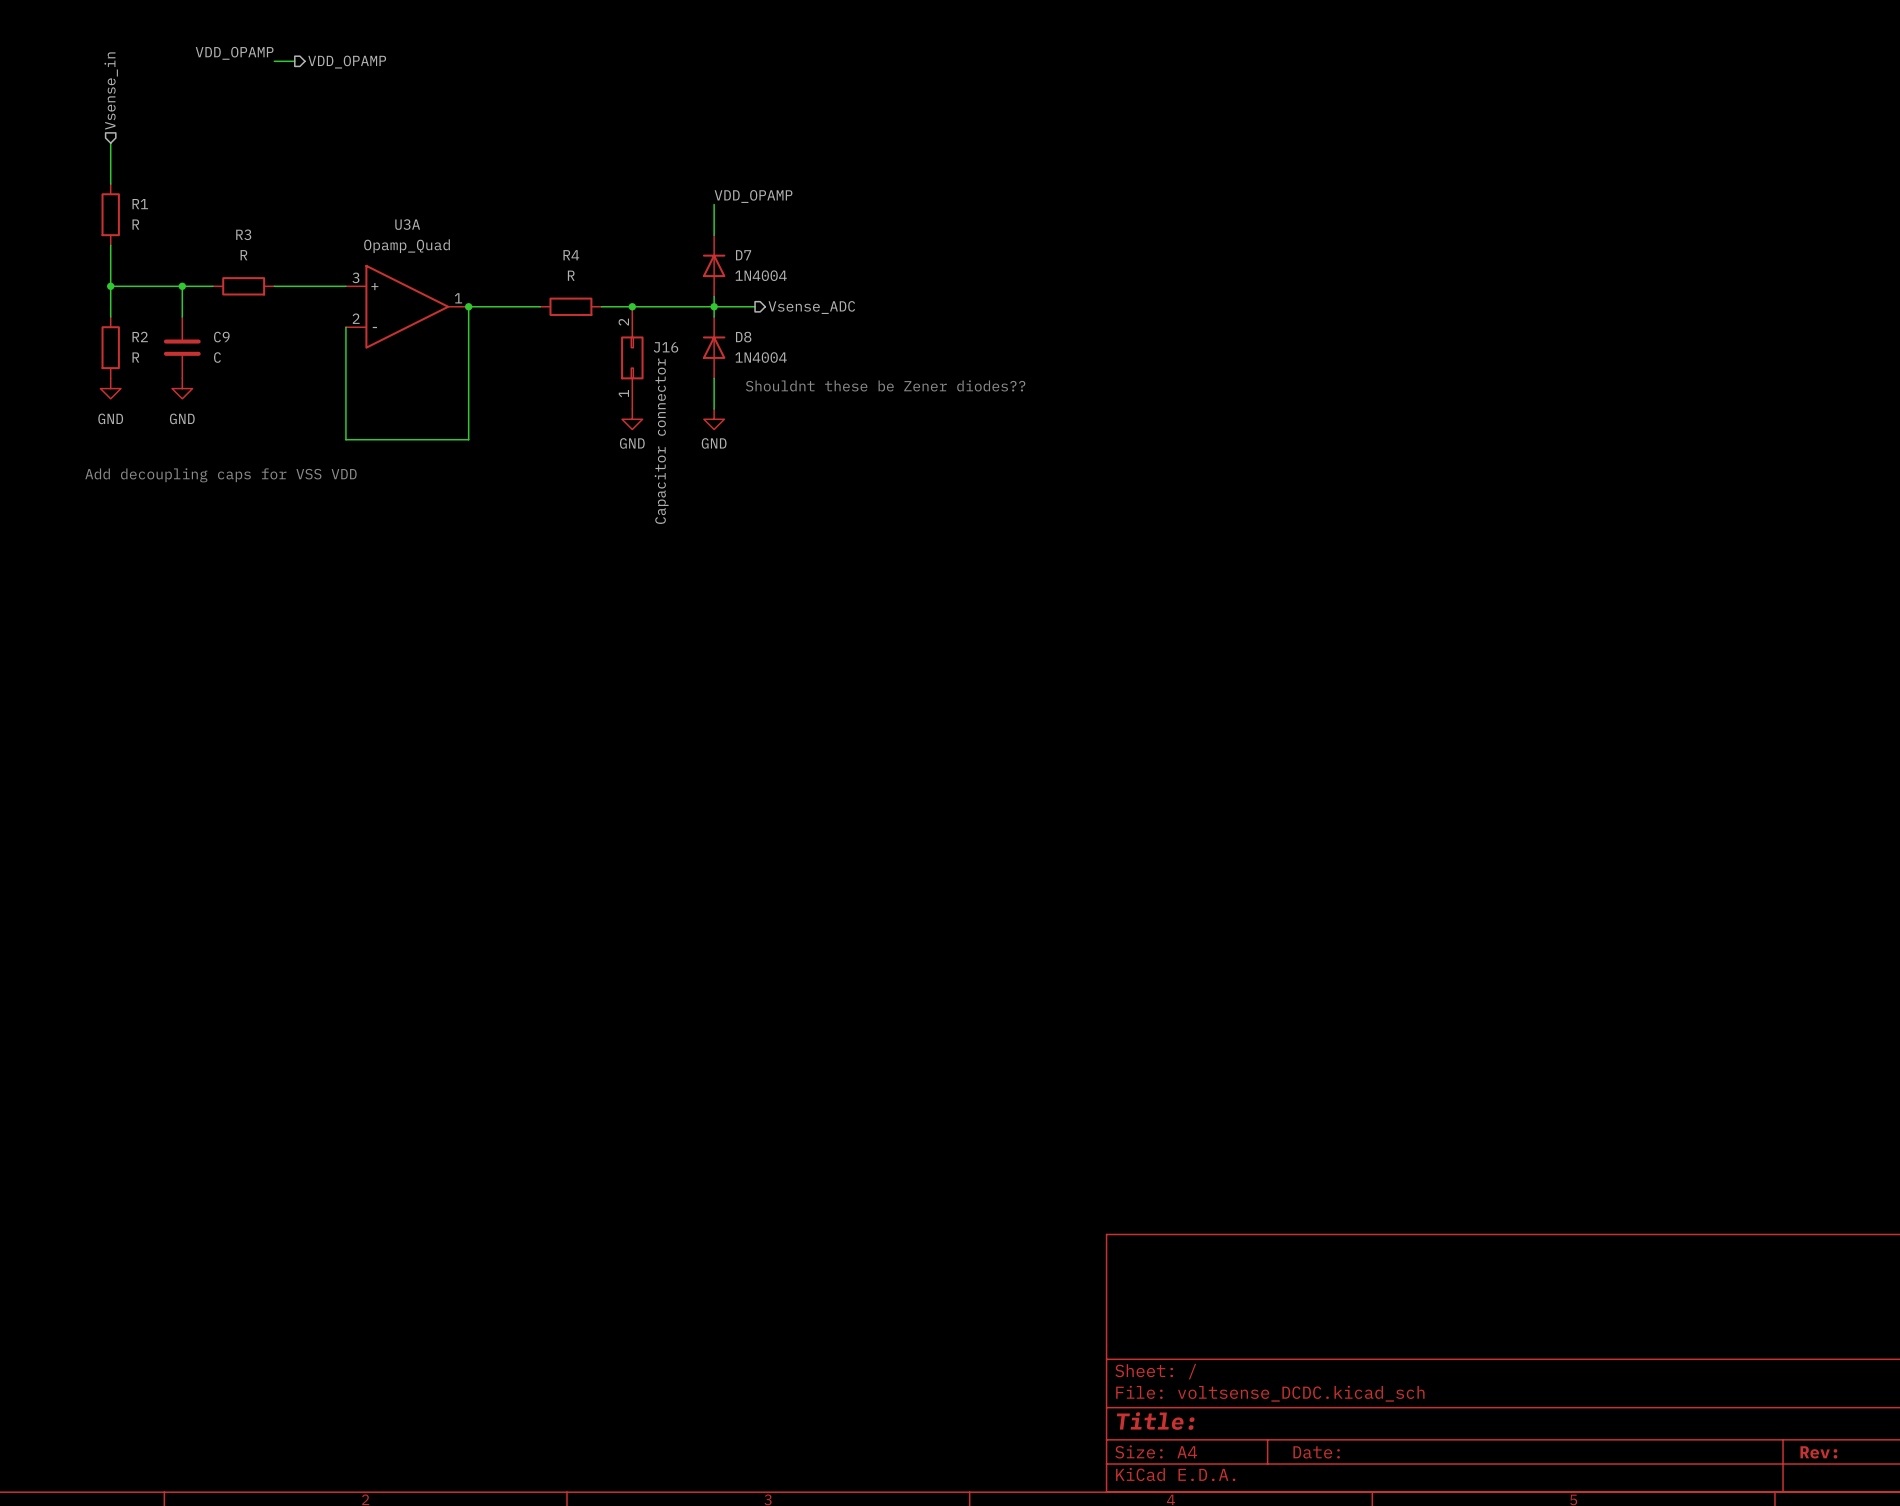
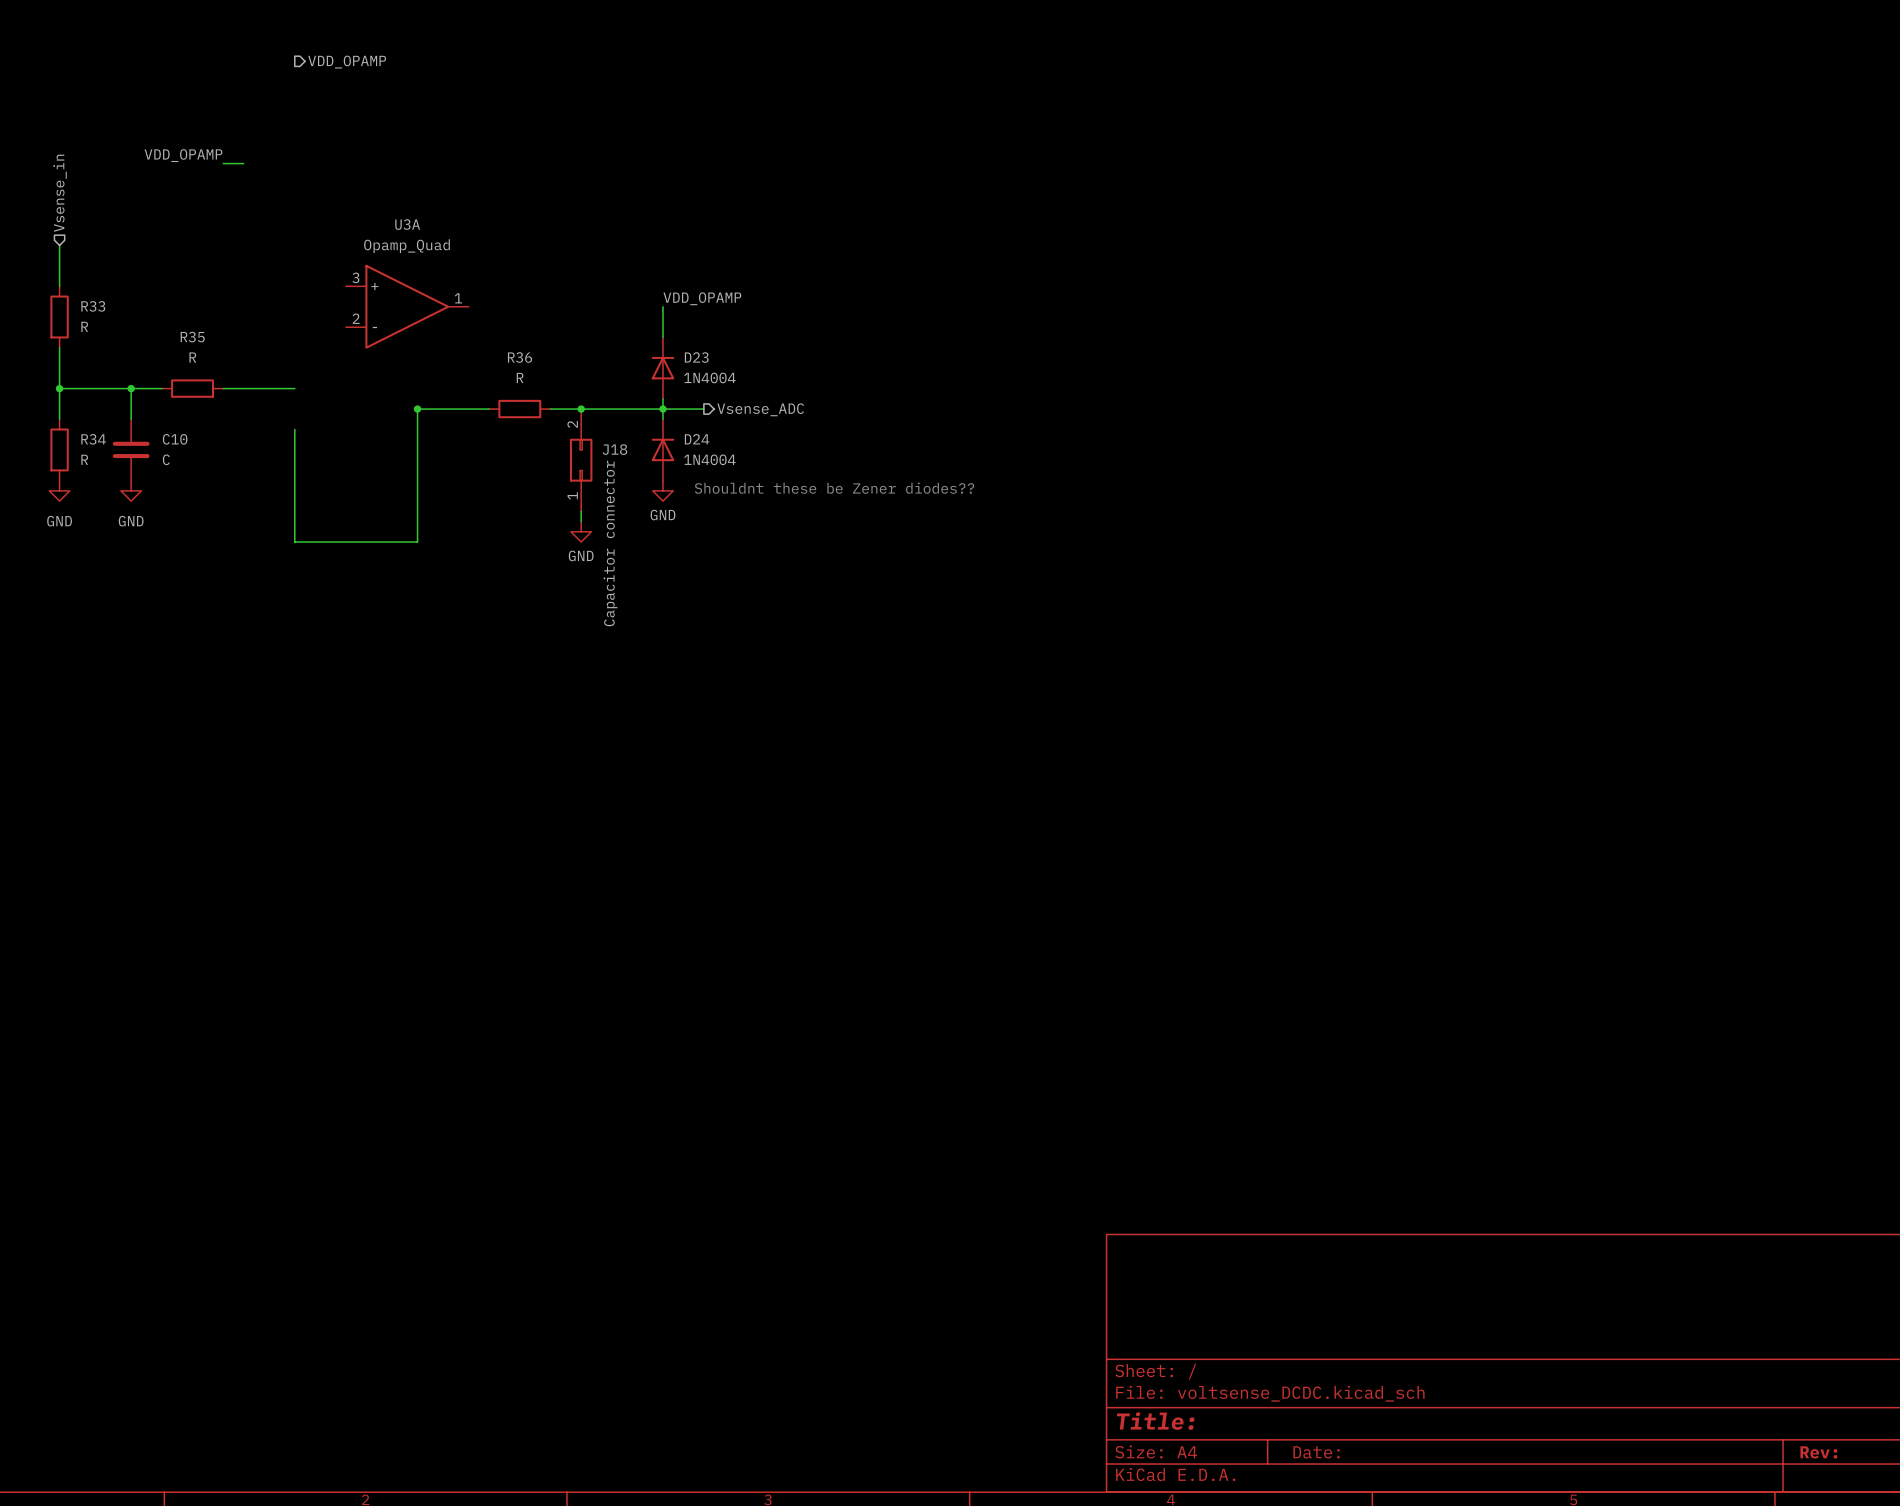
label position: VDD_OPAMP (234, 53) -> VDD_OPAMP (183, 155)
wire: (274, 61) (294, 61) -> (223, 163) (243, 163)
hierarchical label position: Vsense_in (111, 90) -> Vsense_in (60, 193)
wire: (110, 143) (110, 184) -> (59, 245) (59, 286)
label position: VDD_OPAMP (753, 196) -> VDD_OPAMP (702, 298)
wire: (714, 204) (714, 235) -> (662, 306) (662, 337)
R1: R (110, 214) -> none
wire: (110, 245) (110, 316) -> (59, 347) (59, 419)
D7: 1N4004 (714, 265) -> none
wire: (110, 286) (212, 286) -> (59, 388) (161, 388)
junction: (110, 286) -> none
wire: (182, 286) (182, 316) -> (131, 388) (131, 419)
junction: (182, 286) -> none
R3: R (243, 286) -> none
wire: (274, 286) (345, 286) -> (223, 388) (294, 388)
wire: (714, 296) (714, 316) -> (662, 398) (662, 419)
junction: (468, 306) -> none
wire: (540, 306) (468, 306) (468, 439) (345, 439) (345, 327) -> (489, 409) (417, 409) (417, 542) (294, 542) (294, 429)
R4: R (570, 306) -> none
wire: (601, 306) (755, 306) -> (550, 409) (703, 409)
junction: (632, 306) -> none
junction: (714, 306) -> none
hierarchical label position: Vsense_ADC (811, 307) -> Vsense_ADC (760, 409)
R33: none -> R (59, 316)
R2: R (110, 347) -> none
C9: C (182, 347) -> none
D8: 1N4004 (714, 347) -> none
J16: Capacitor connector (632, 357) -> none
D23: none -> 1N4004 (662, 368)
wire: (714, 378) (714, 409) -> none
text position: Shouldnt these be Zener diodes?? (885, 385) -> Shouldnt these be Zener diodes?? (834, 488)
junction: none -> (59, 388)
power symbol: GND (110, 388) -> none
junction: none -> (131, 388)
power symbol: GND (182, 388) -> none
R35: none -> R (192, 388)
junction: none -> (417, 409)
R36: none -> R (519, 409)
junction: none -> (581, 409)
junction: none -> (662, 409)
power symbol: GND (632, 419) -> none
power symbol: GND (714, 419) -> none
R34: none -> R (59, 449)
C10: none -> C (131, 449)
D24: none -> 1N4004 (662, 449)
J18: none -> Capacitor connector (581, 460)
text: Add decoupling caps for VSS VDD (220, 475) -> none
power symbol: none -> GND (59, 490)
power symbol: none -> GND (131, 490)
power symbol: none -> GND (662, 490)
wire: none -> (581, 511) (581, 521)
power symbol: none -> GND (581, 531)

